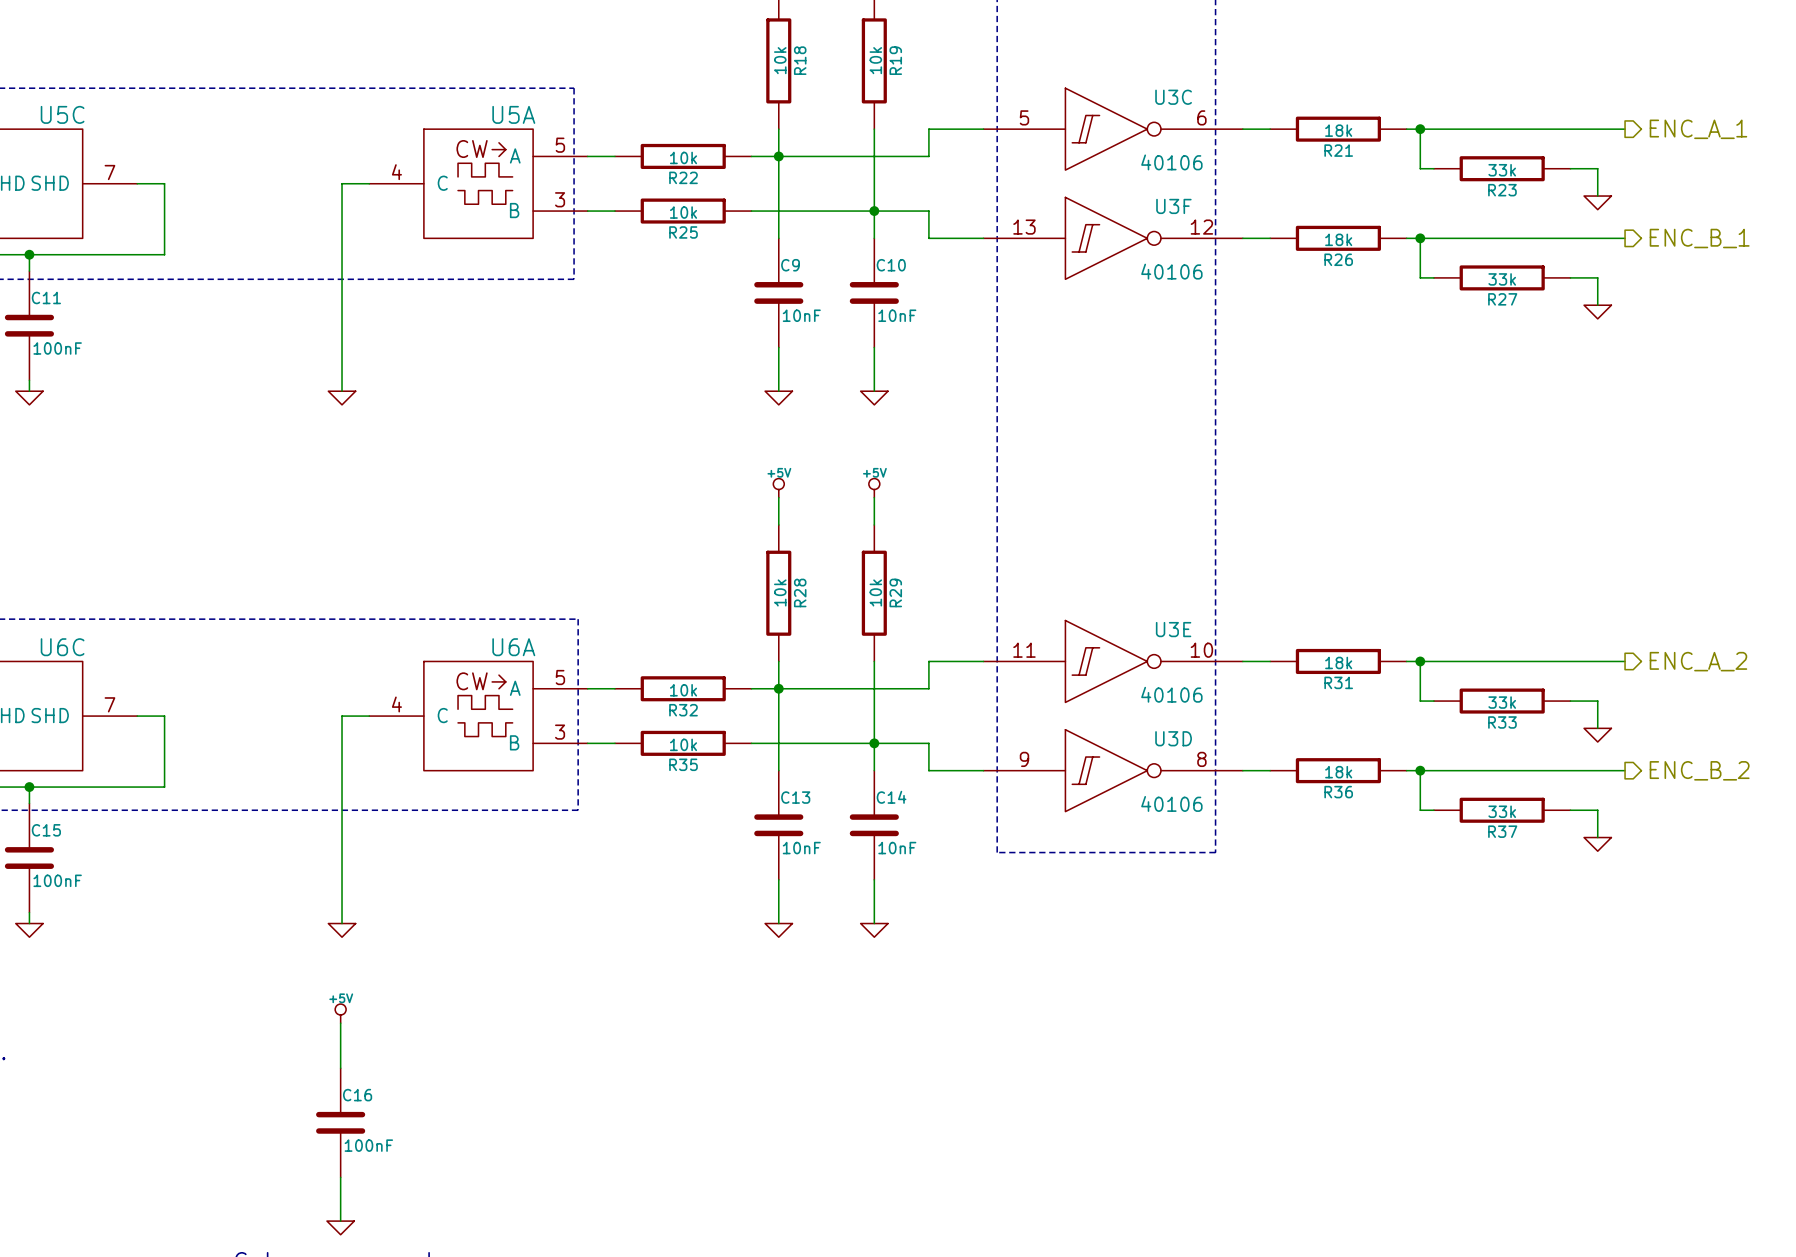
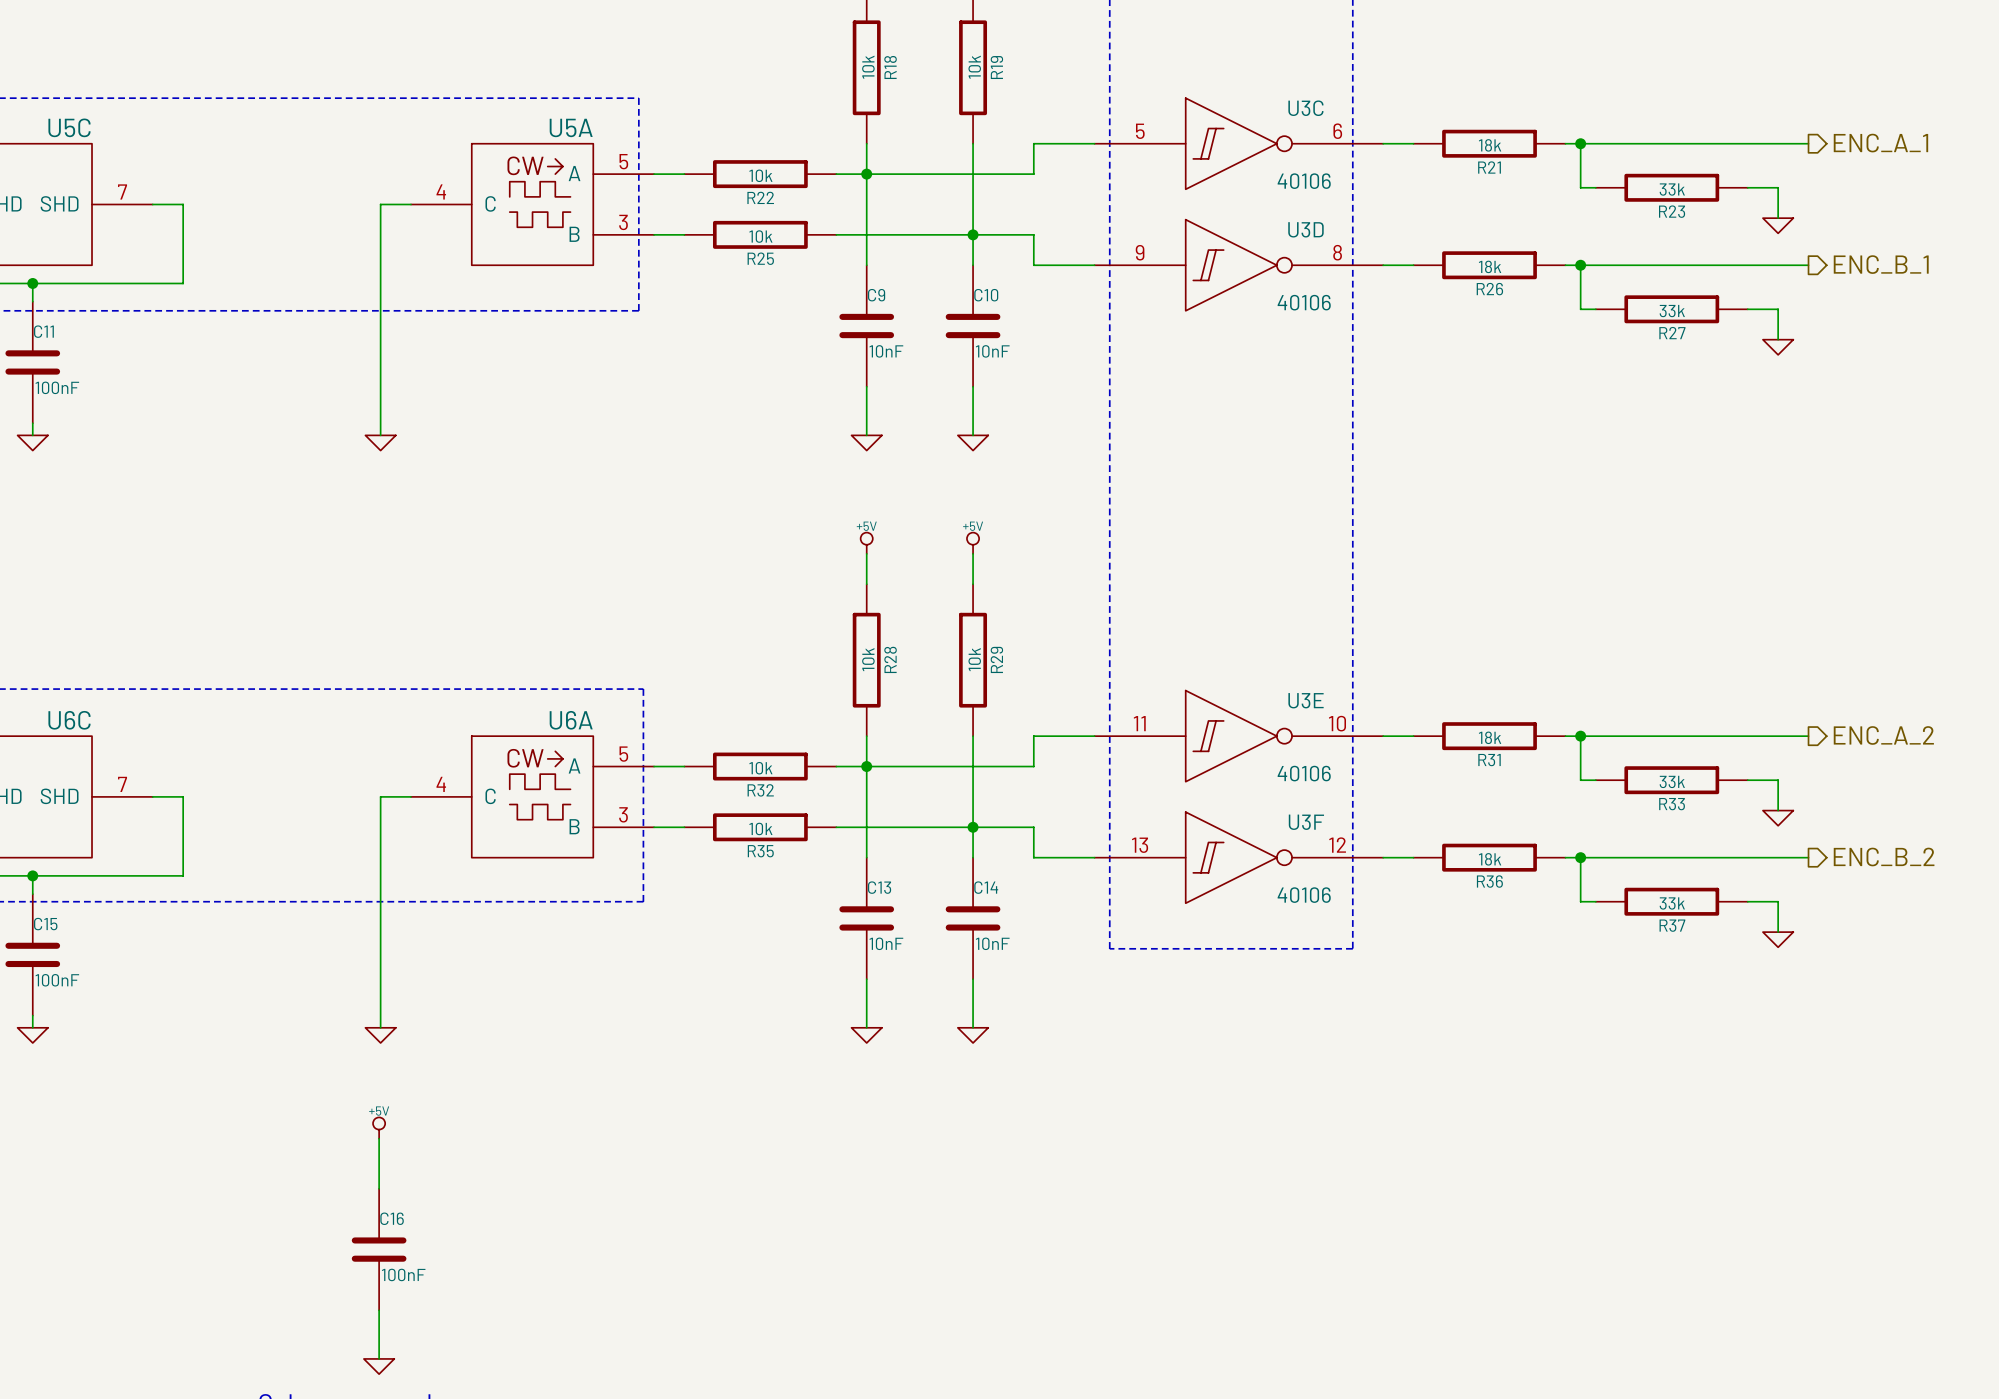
U3F position: (1113, 238) -> (1238, 857)
U3D position: (1113, 770) -> (1238, 265)

